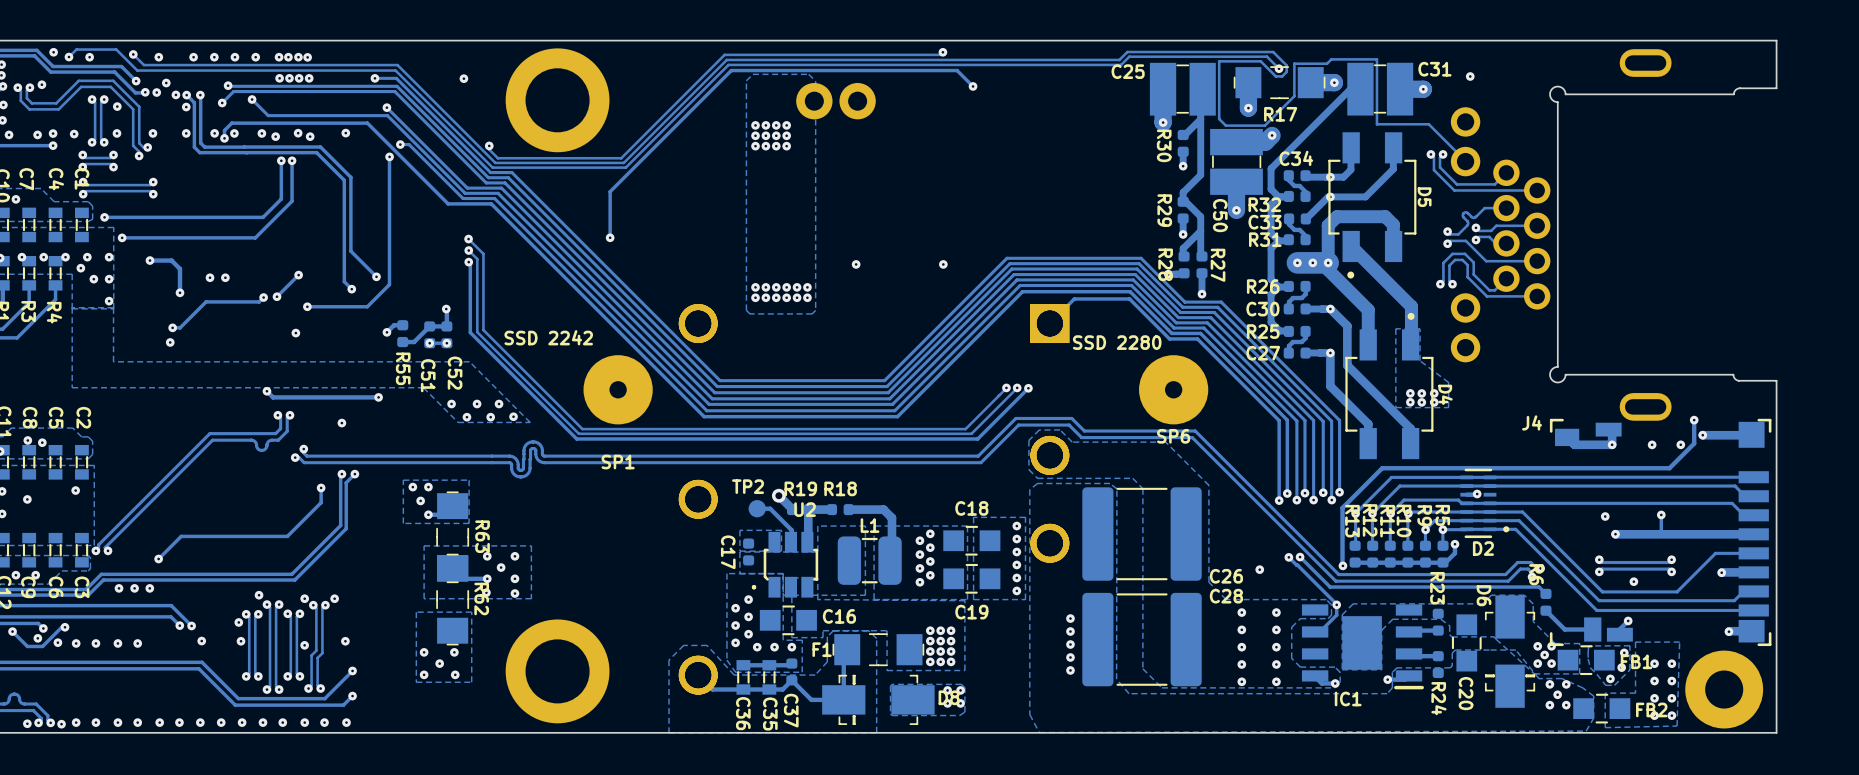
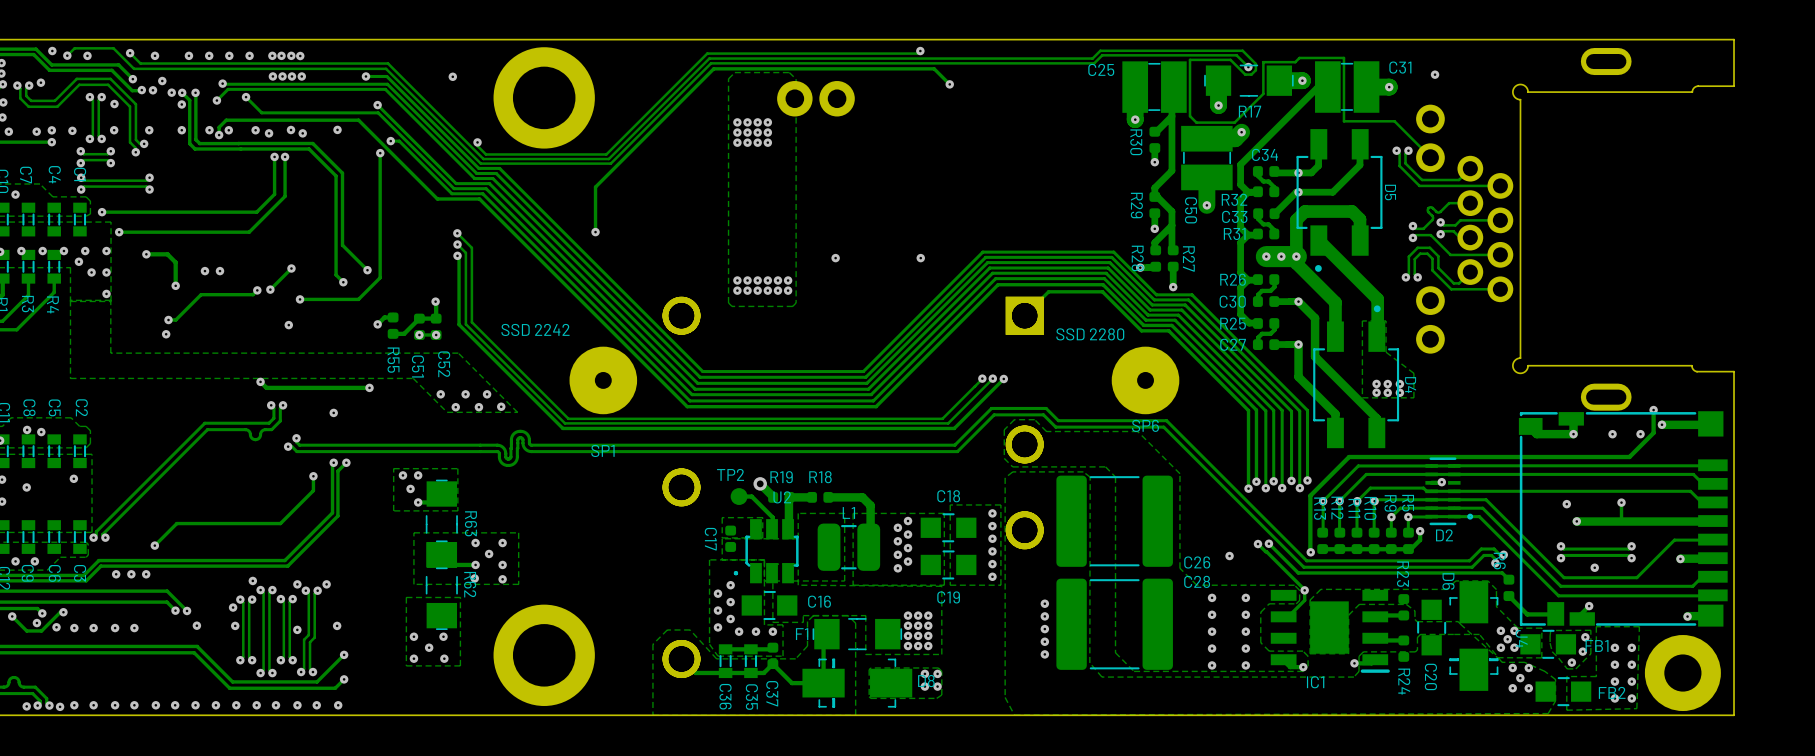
J4 footprint: [1549, 418, 1772, 647] -> [1518, 411, 1728, 627]
J4 name position: J4 (1532, 422) -> J4 (1521, 638)

